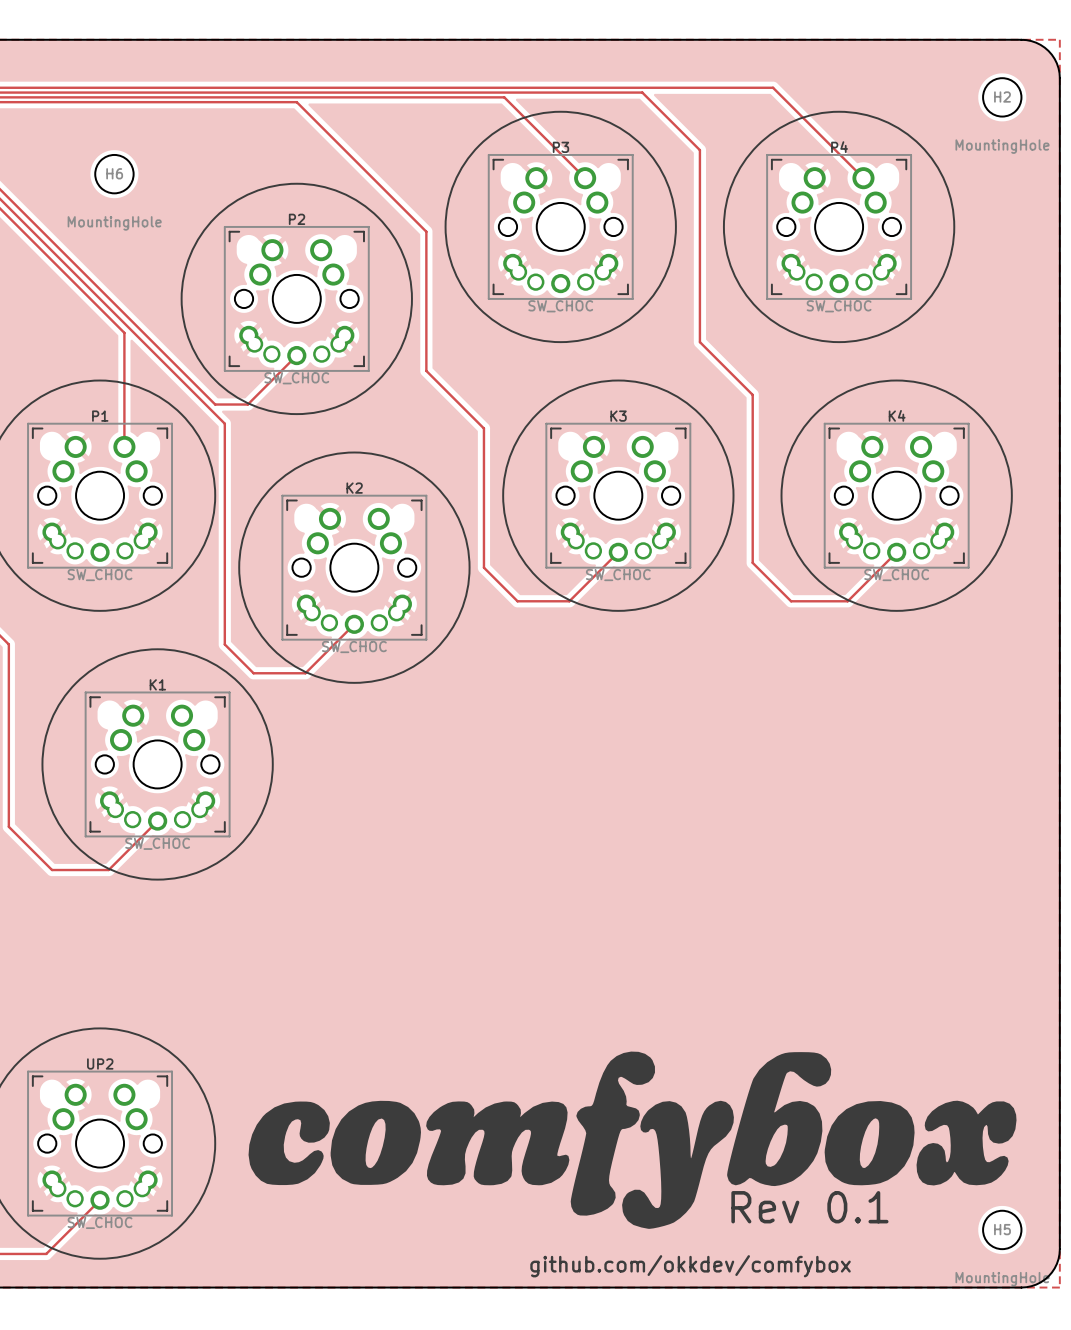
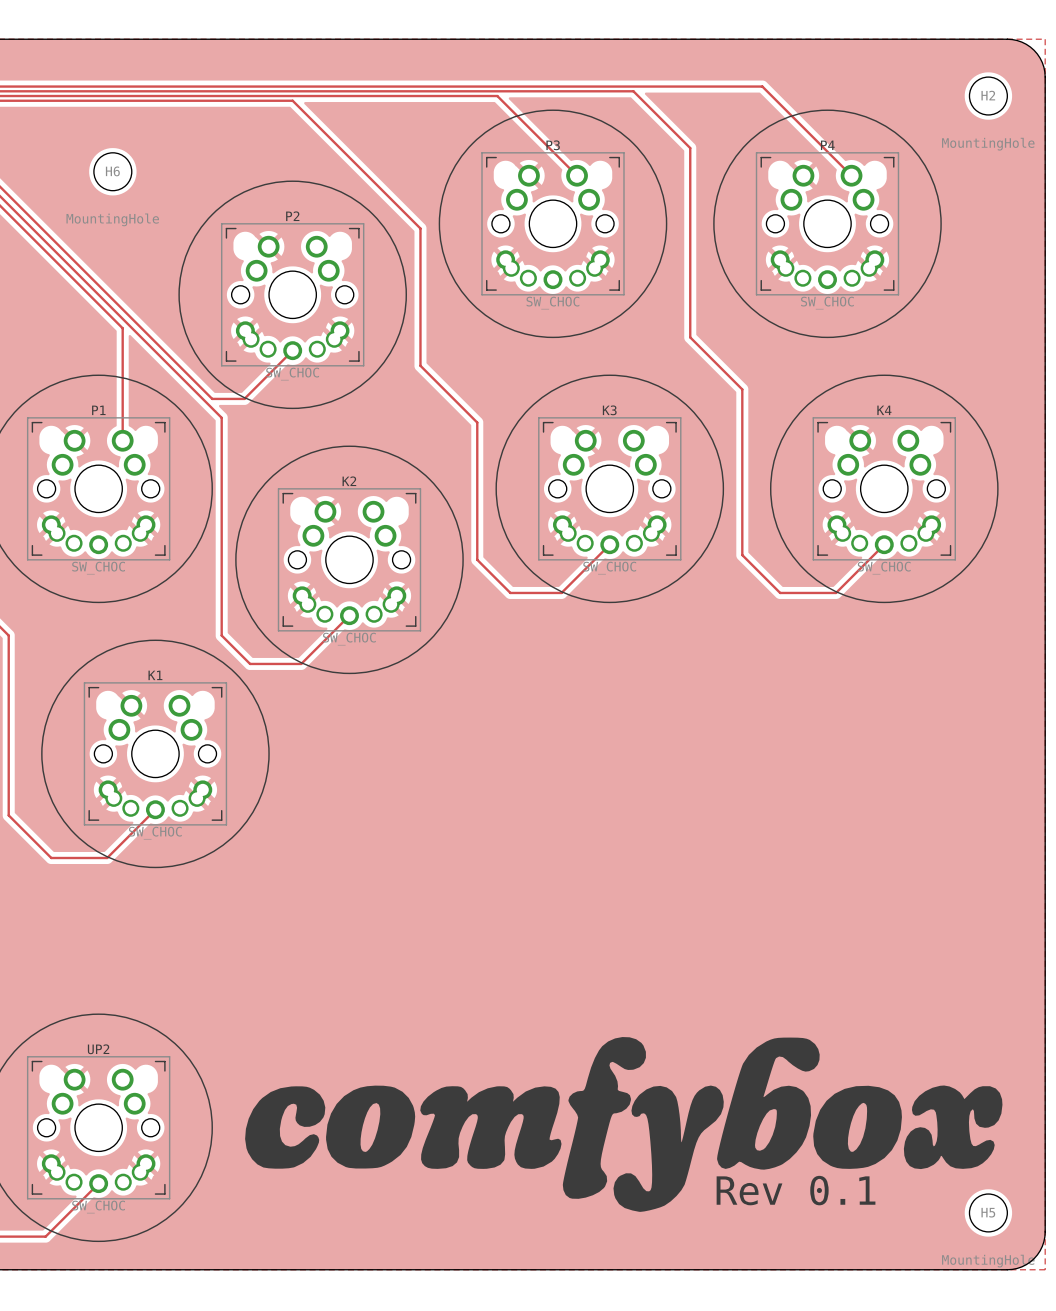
text: github.com/okkdev/comfybox (690, 1266) -> none

